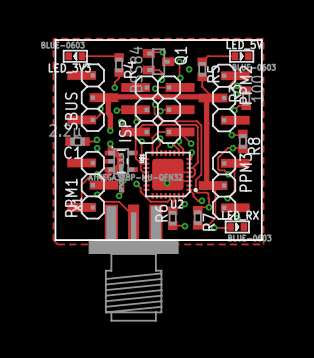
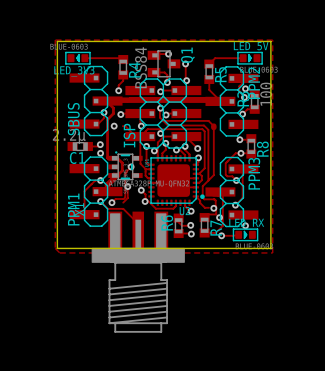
via: (189, 69) -> none
track: none -> (217, 98) (130, 98) (127, 101) (107, 101) (113, 108) (113, 113) (107, 119) (107, 157) (113, 158)
track: (105, 96) (108, 99) (110, 130) -> none
track: (206, 96) (206, 121) -> (163, 120) (208, 120) (213, 126)
via: none -> (114, 126)
via: (121, 121) -> none
track: (206, 123) (206, 187) -> (213, 127) (213, 175) (208, 180)
via: none -> (160, 133)
via: (110, 130) -> none
track: (110, 143) (109, 152) (115, 152) (119, 157) (119, 165) (113, 169) -> (122, 166) (122, 170) (117, 175)
via: (110, 143) -> none
via: none -> (154, 150)
track: none -> (131, 166) (125, 173) (125, 197) (115, 199) (111, 202)
via: none -> (131, 166)
via: (167, 183) -> none
via: none -> (145, 201)
via: none -> (111, 202)
via: (119, 195) -> none
track: (174, 195) (172, 210) -> (190, 225) (182, 225) (178, 222) (178, 218)
via: (201, 200) -> none
via: none -> (213, 208)
via: (209, 207) -> none
via: none -> (219, 217)
via: none -> (190, 225)

